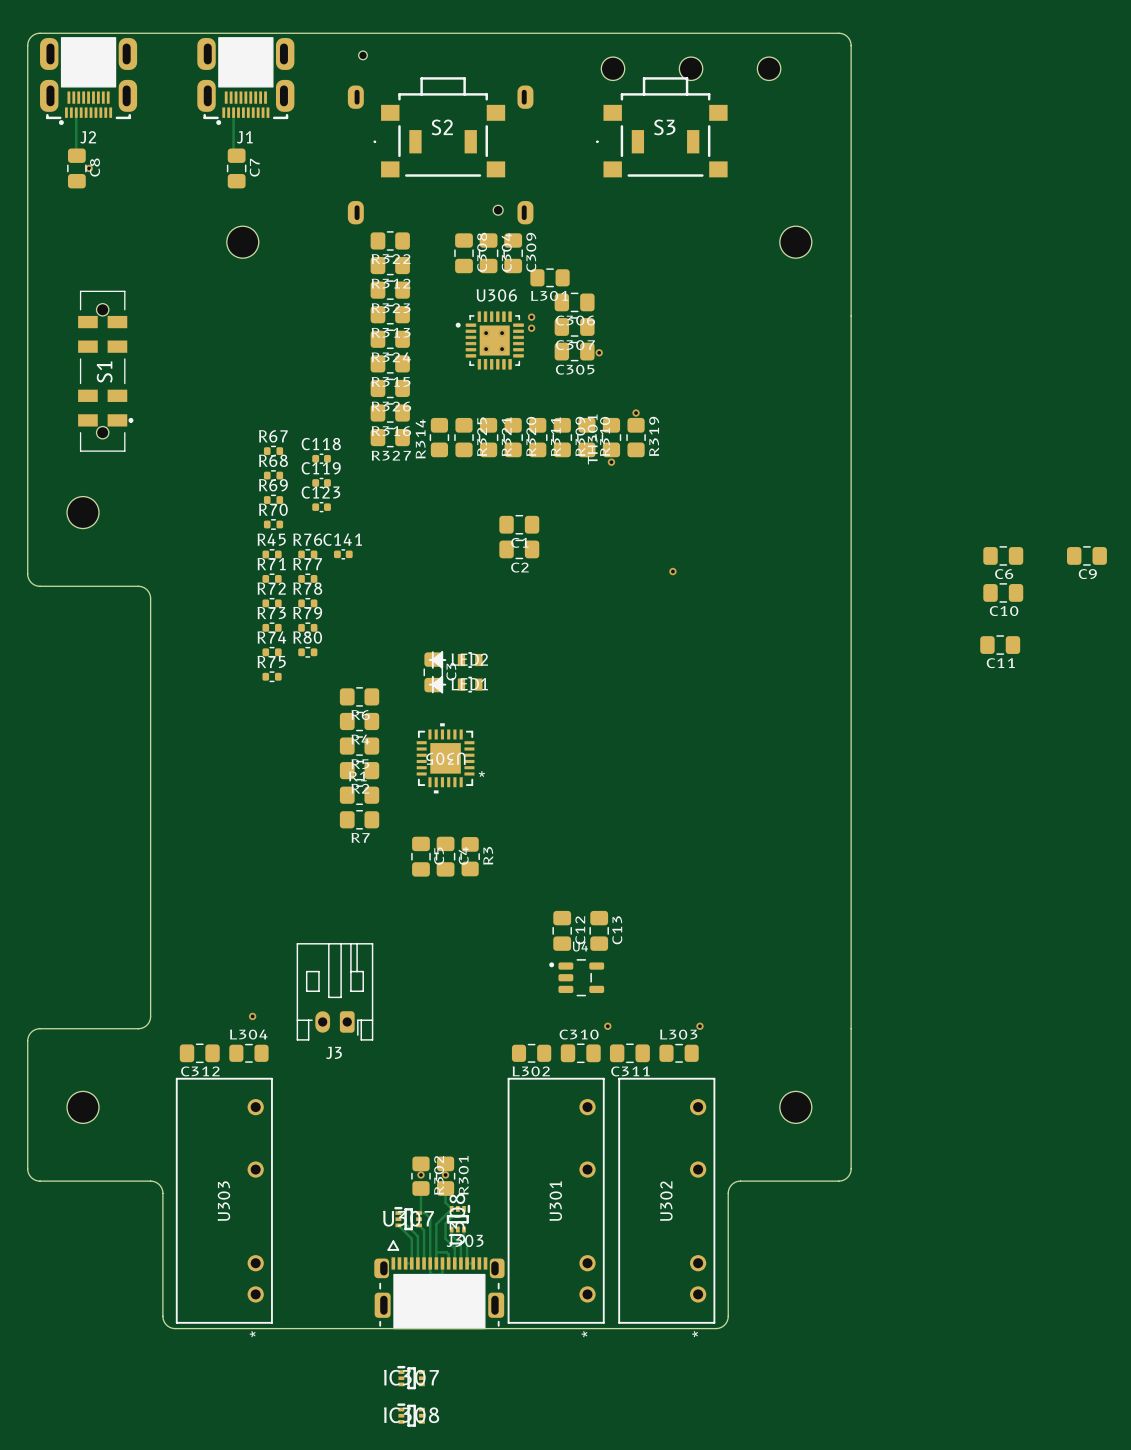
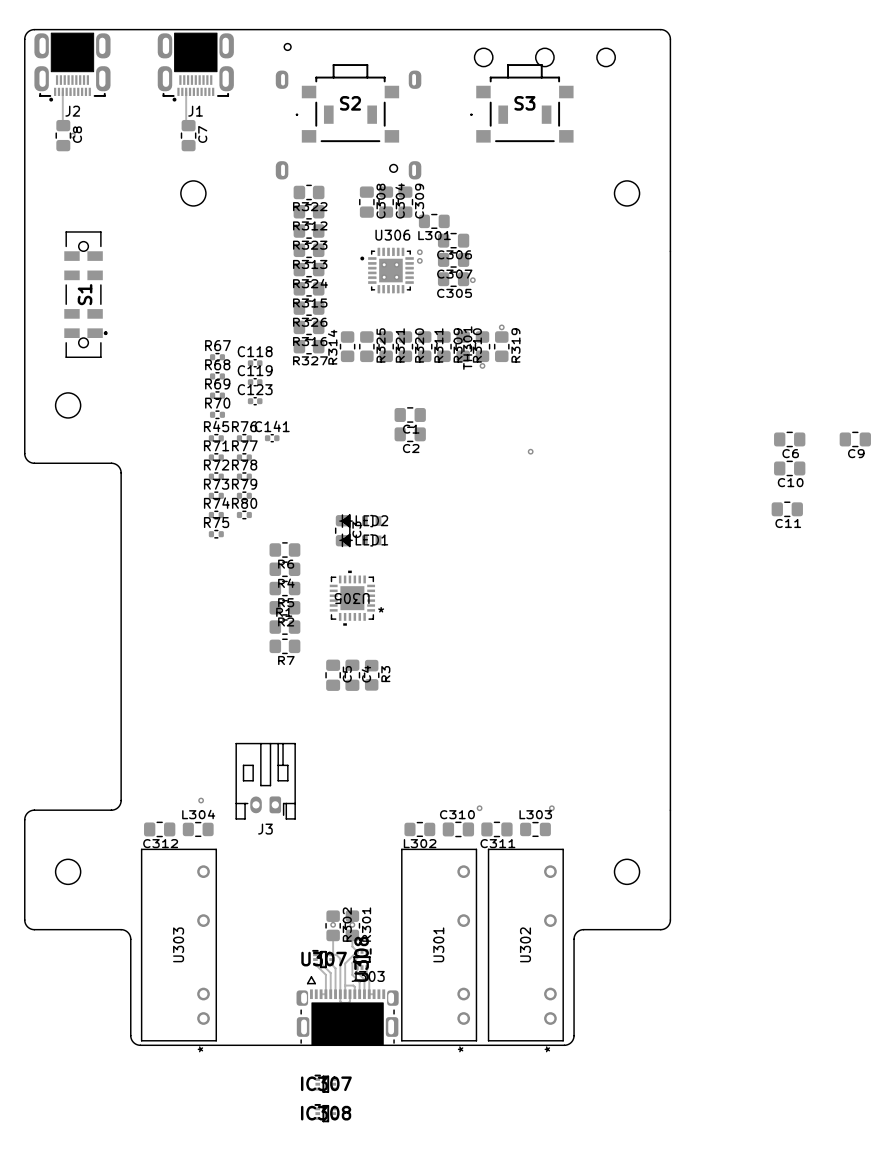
C12: (562, 930) -> none
C13: (599, 930) -> none
U4: (576, 977) -> none

